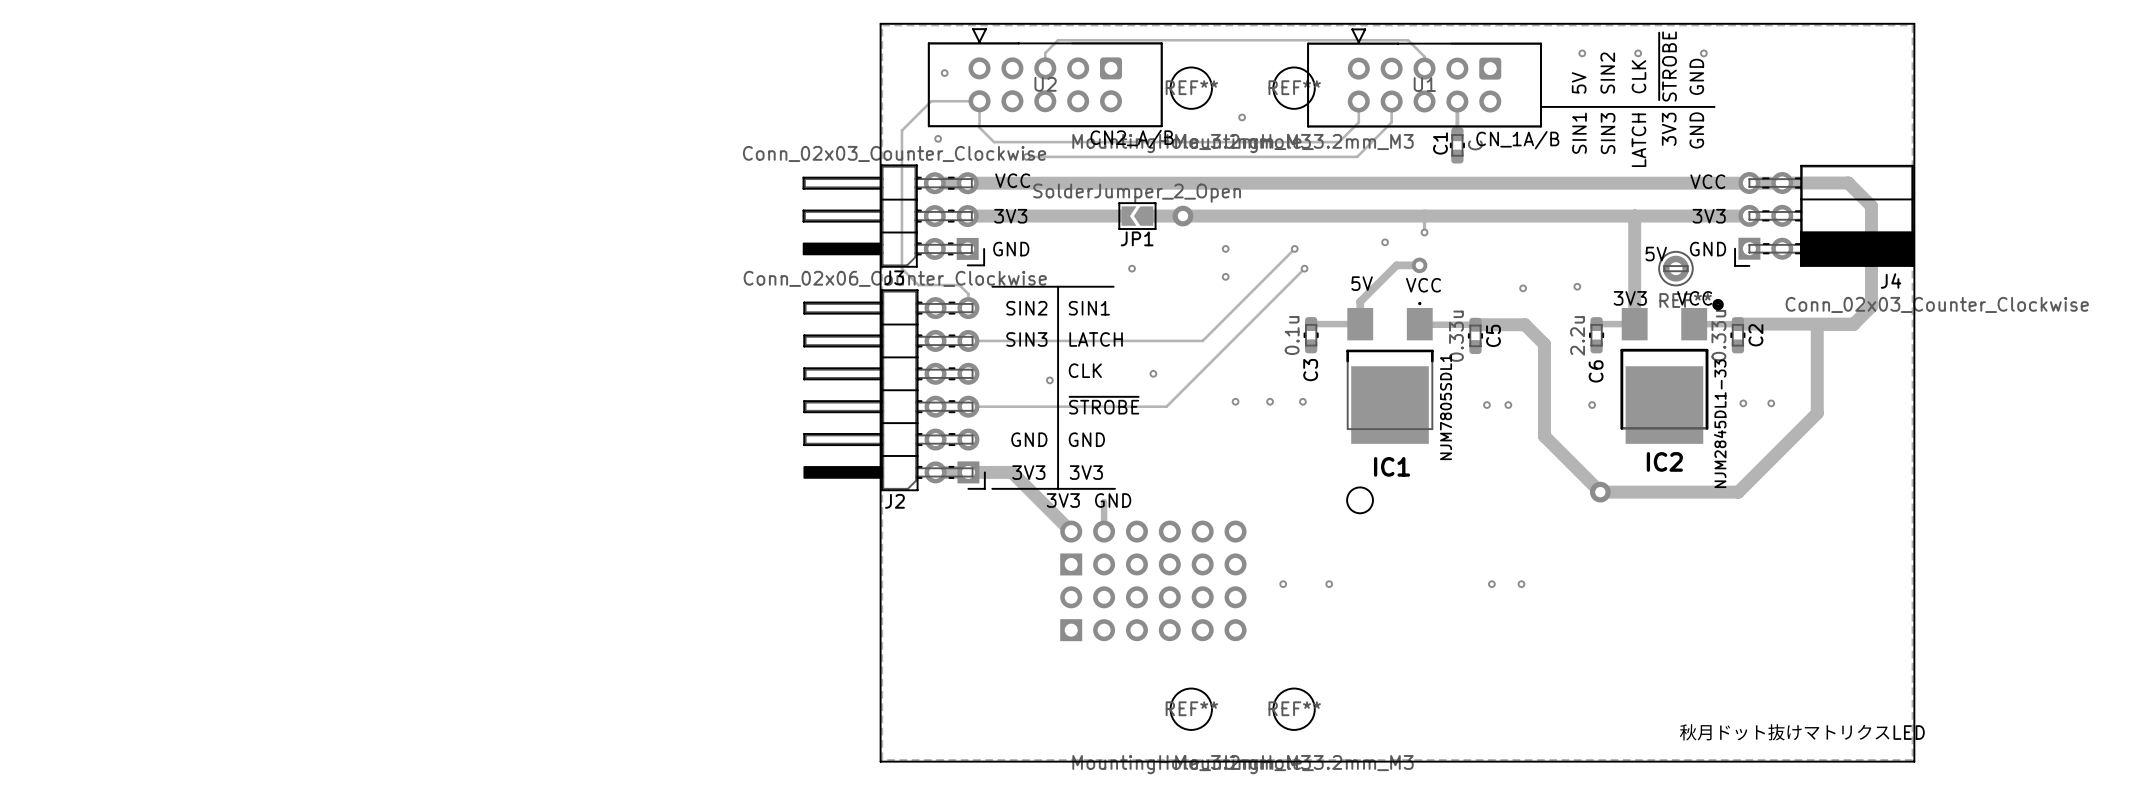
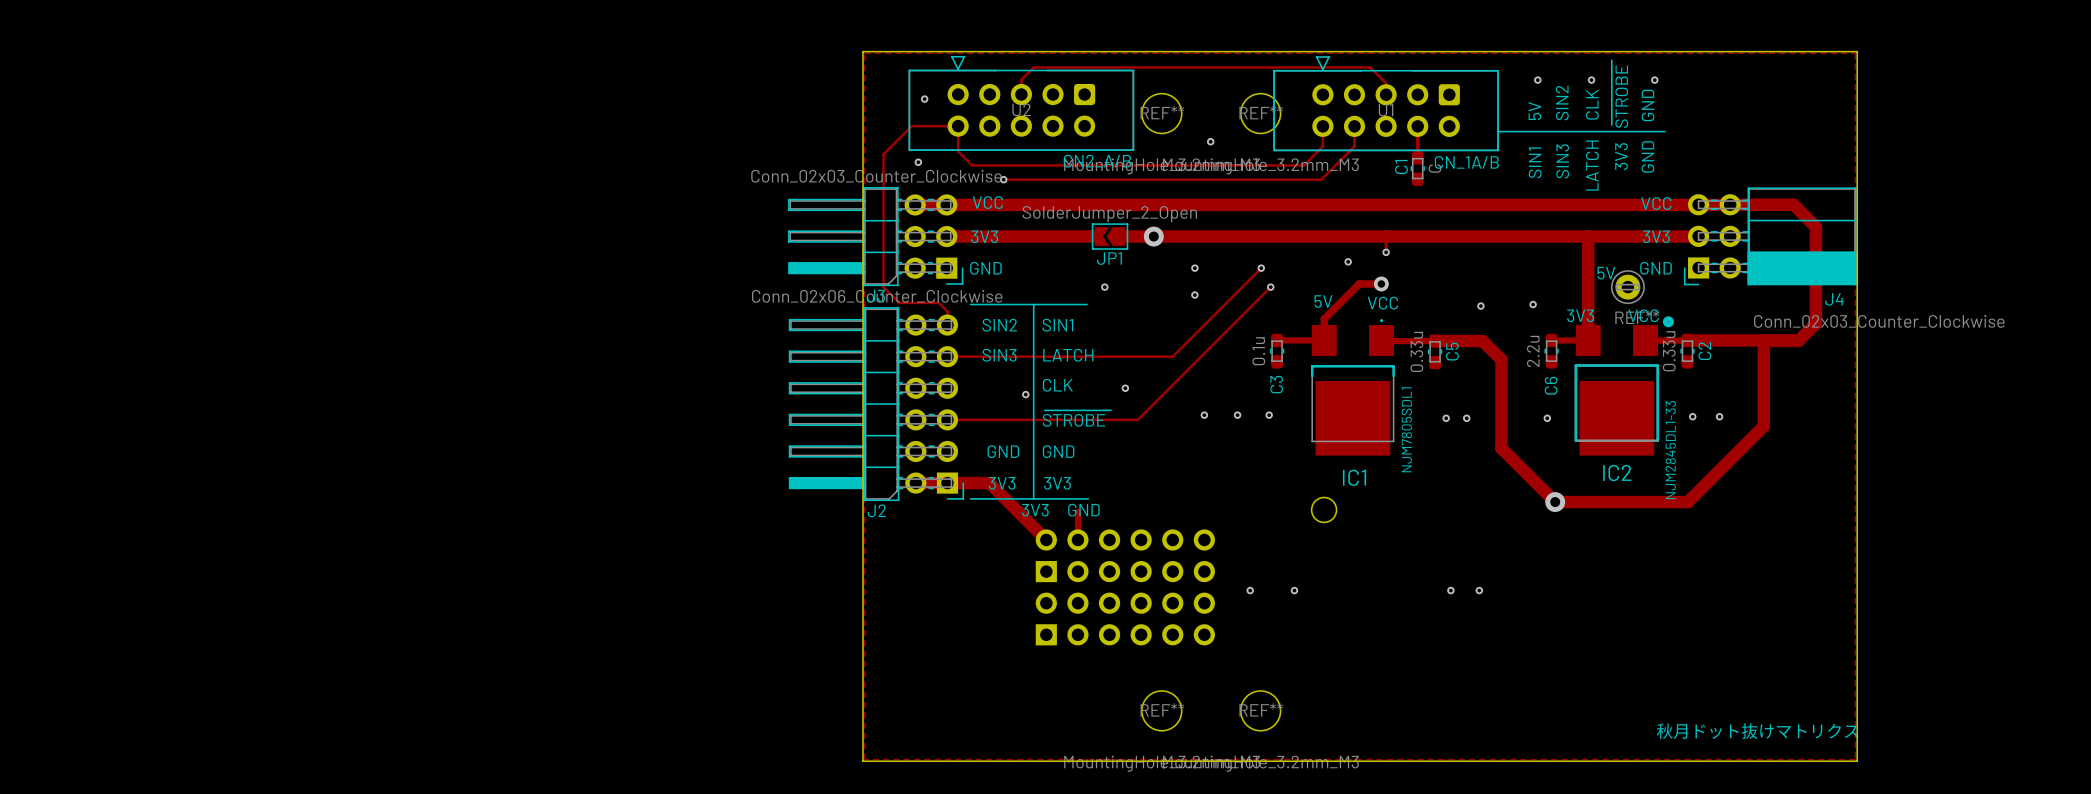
text: 秋月ドット抜けマトリクスLED (1801, 732) -> 秋月ドット抜けマトリクス (1757, 731)

